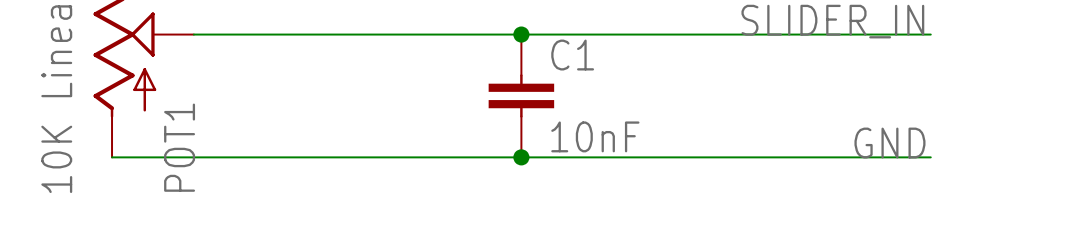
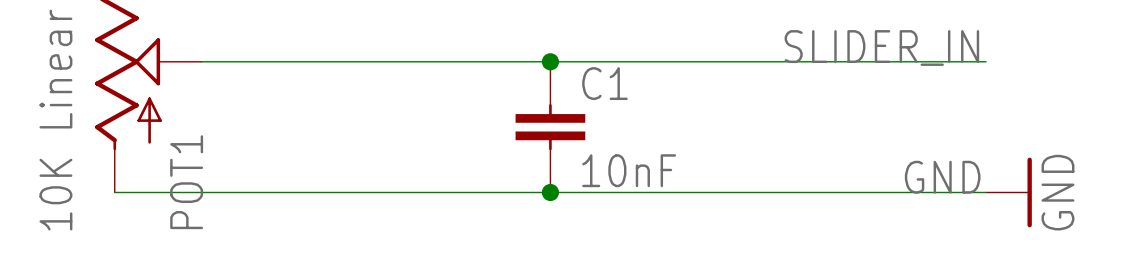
power symbol: none -> GND (1008, 192)

